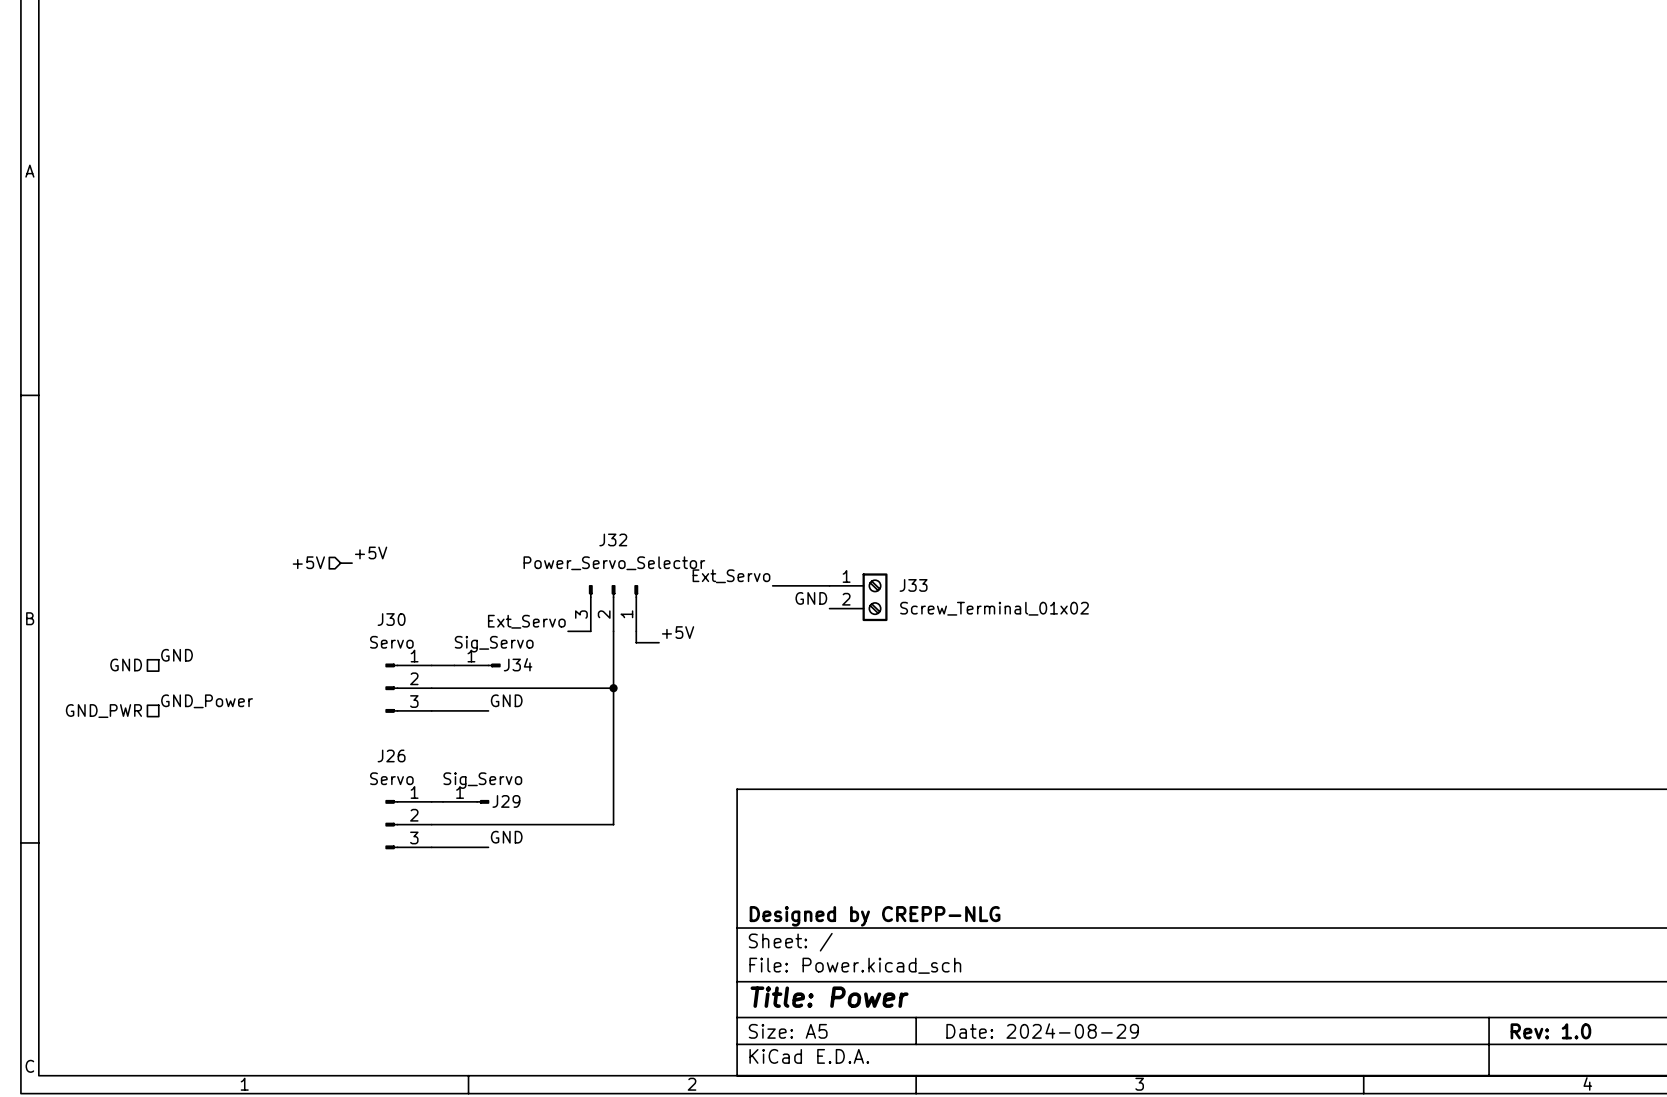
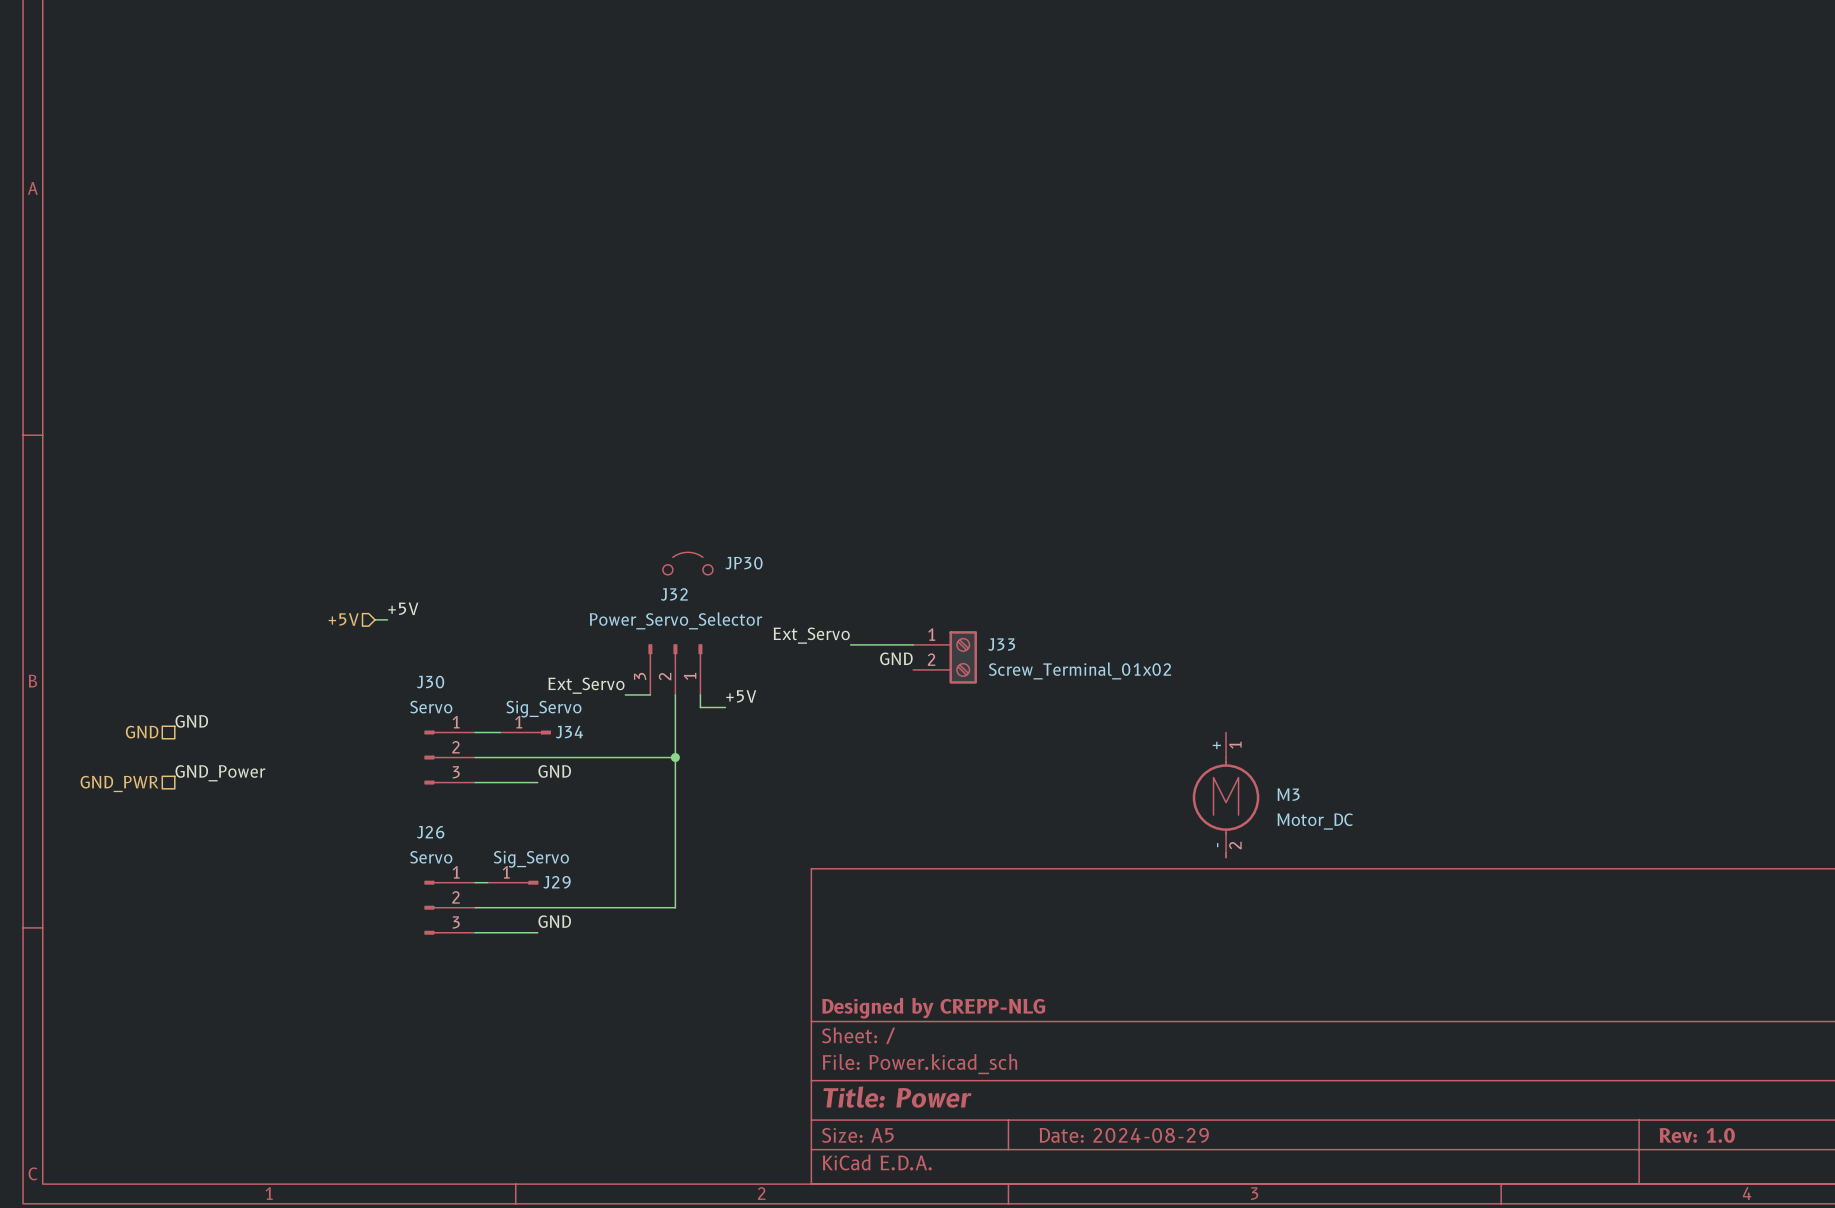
JP30: none -> (687, 563)
M3: none -> Motor_DC (1226, 795)

